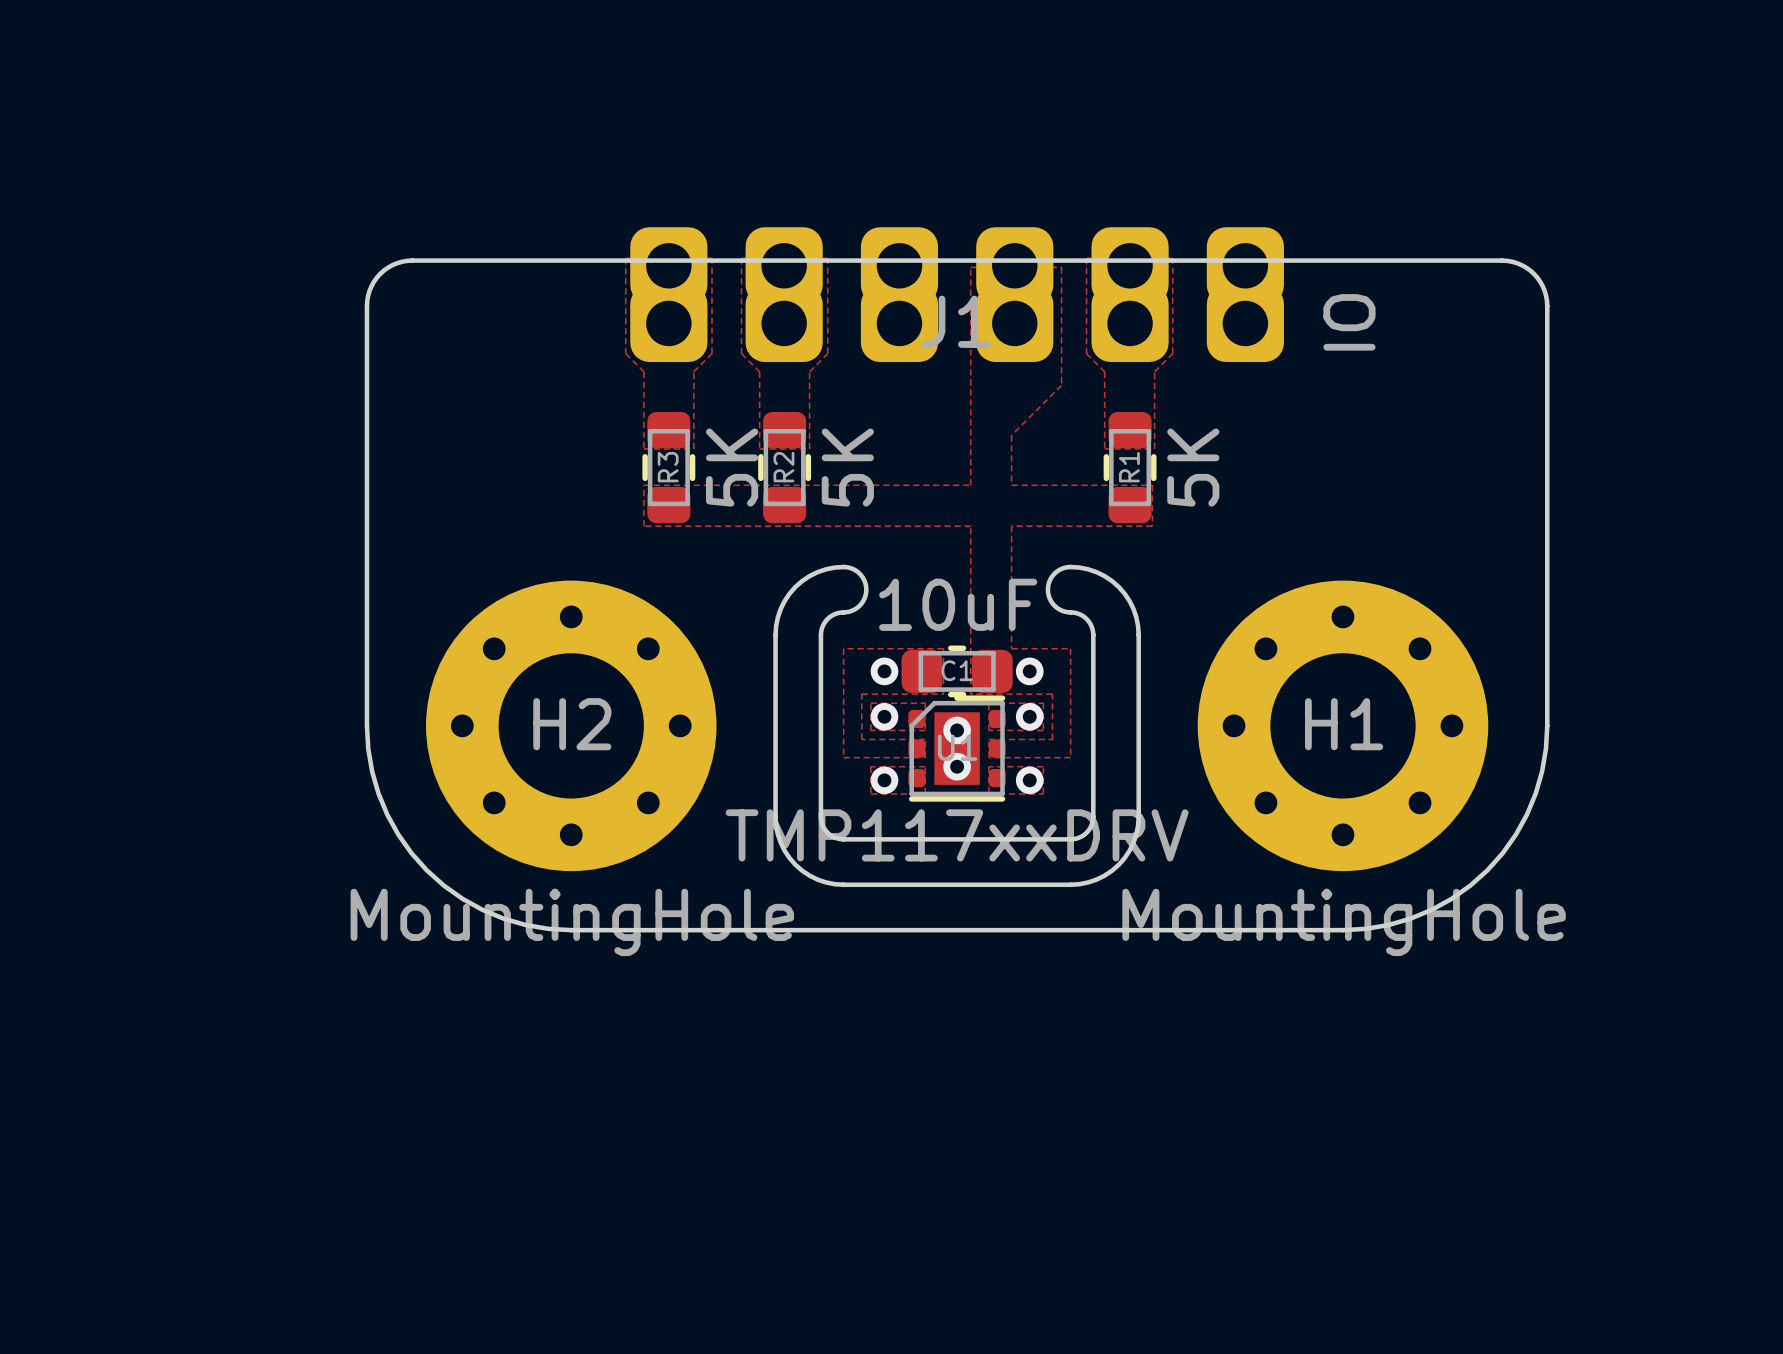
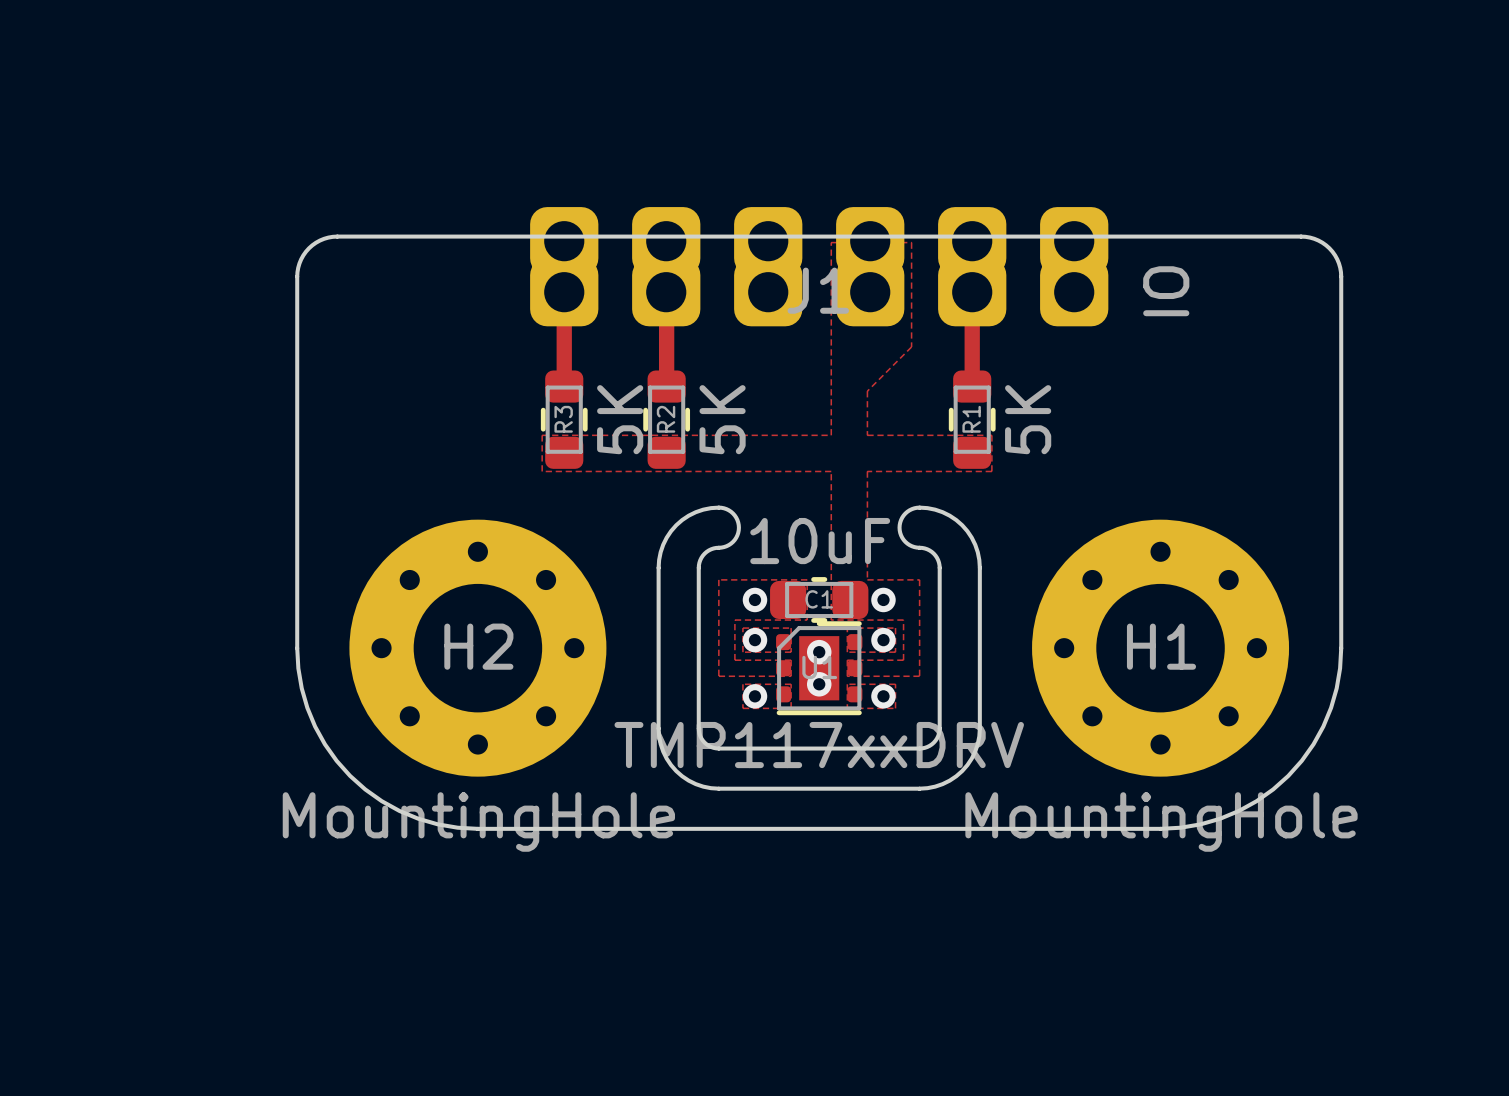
zone outline: (625, 258) (625, 353) (643, 371) (643, 448) (693, 448) (693, 371) (711, 353) (711, 258) (625, 258) -> none
zone outline: (741, 258) (827, 258) (827, 353) (809, 371) (809, 448) (759, 448) (759, 371) (741, 353) (741, 258) -> none
zone outline: (1086, 258) (1172, 258) (1172, 353) (1154, 371) (1154, 448) (1104, 448) (1104, 371) (1086, 353) (1086, 258) -> none
track: none -> (564, 292) (564, 386)
track: none -> (666, 292) (666, 386)
track: none -> (972, 292) (972, 386)

